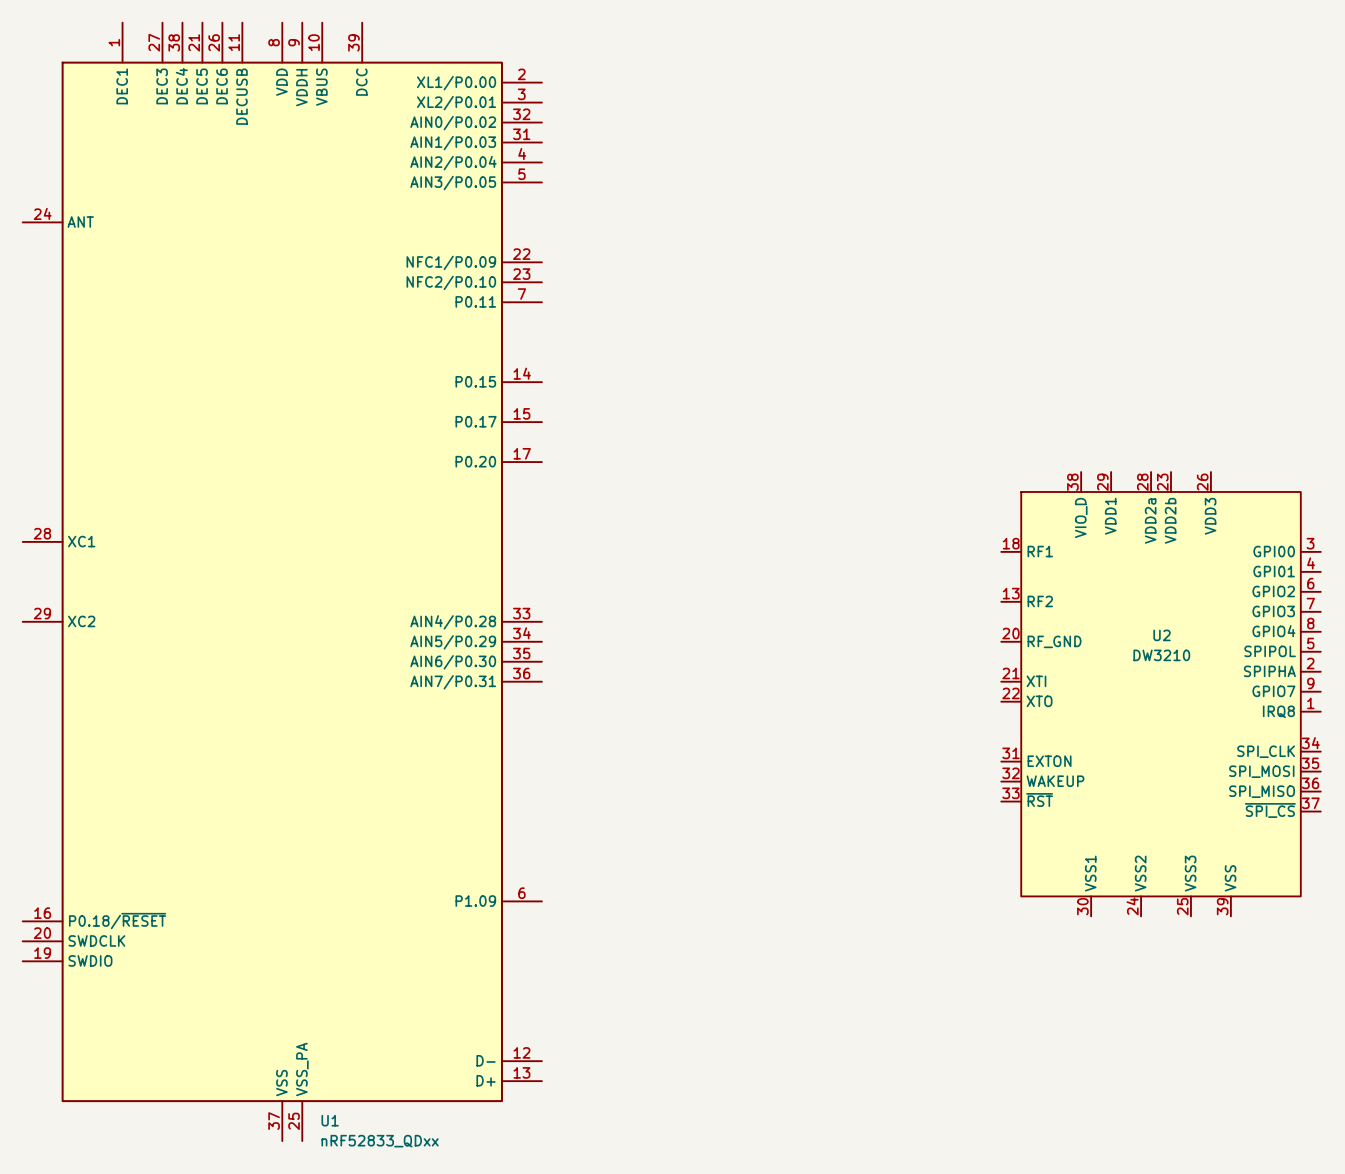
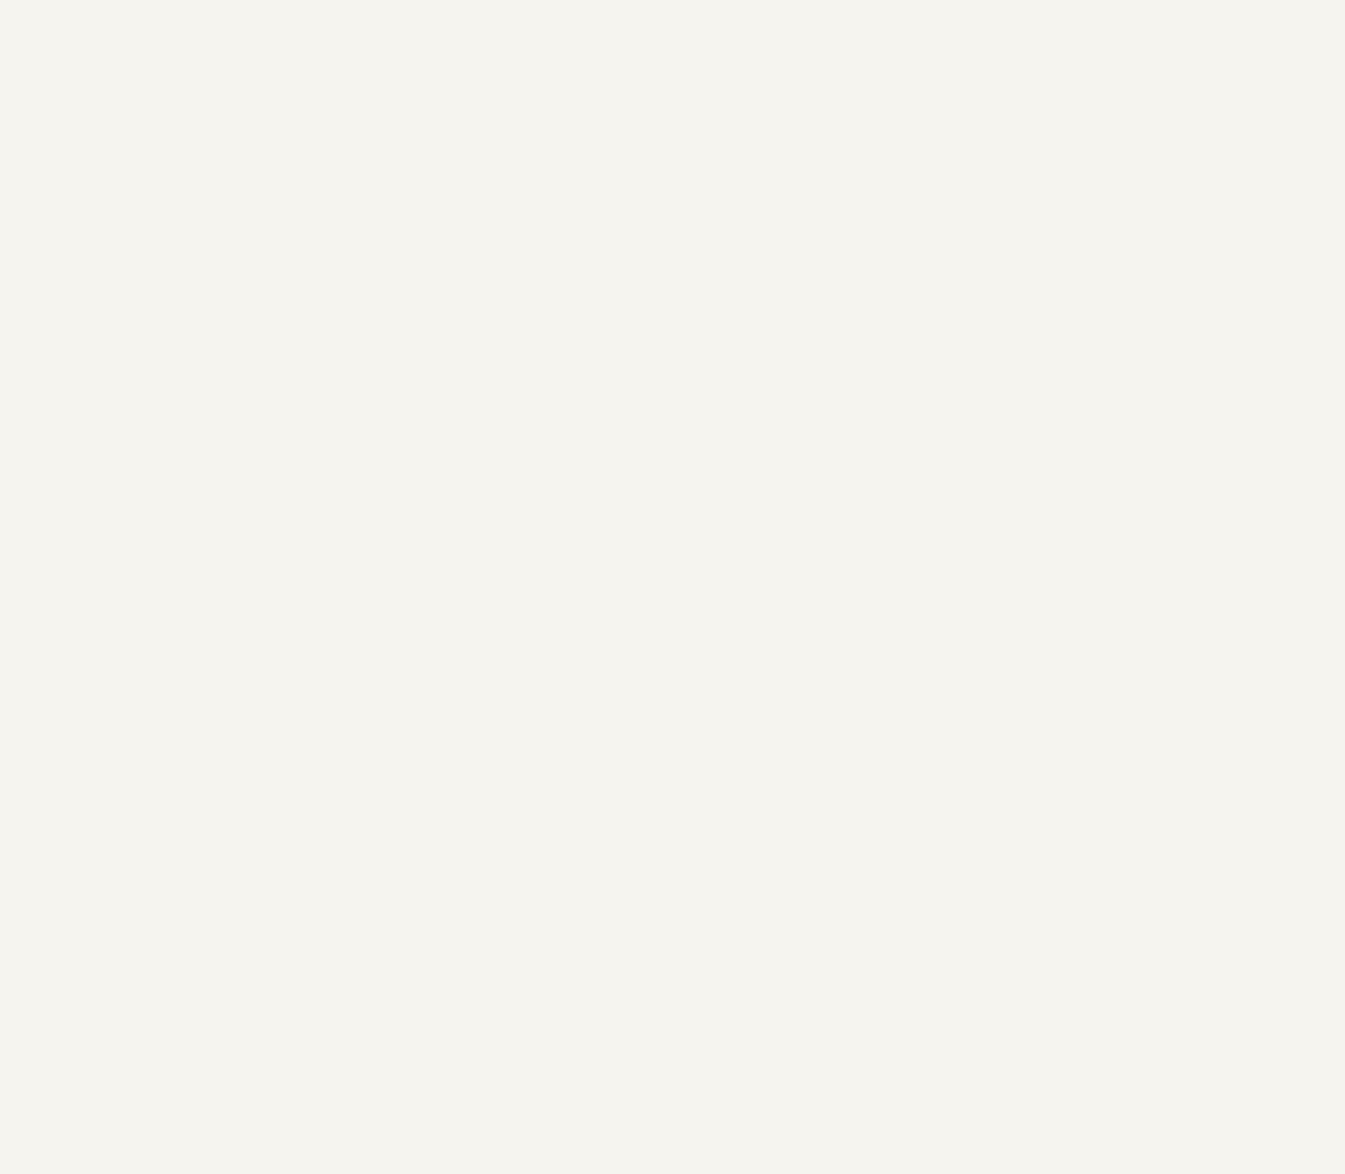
U1: nRF52833_QDxx (282, 581) -> none
U2: DW3210 (1161, 694) -> none

